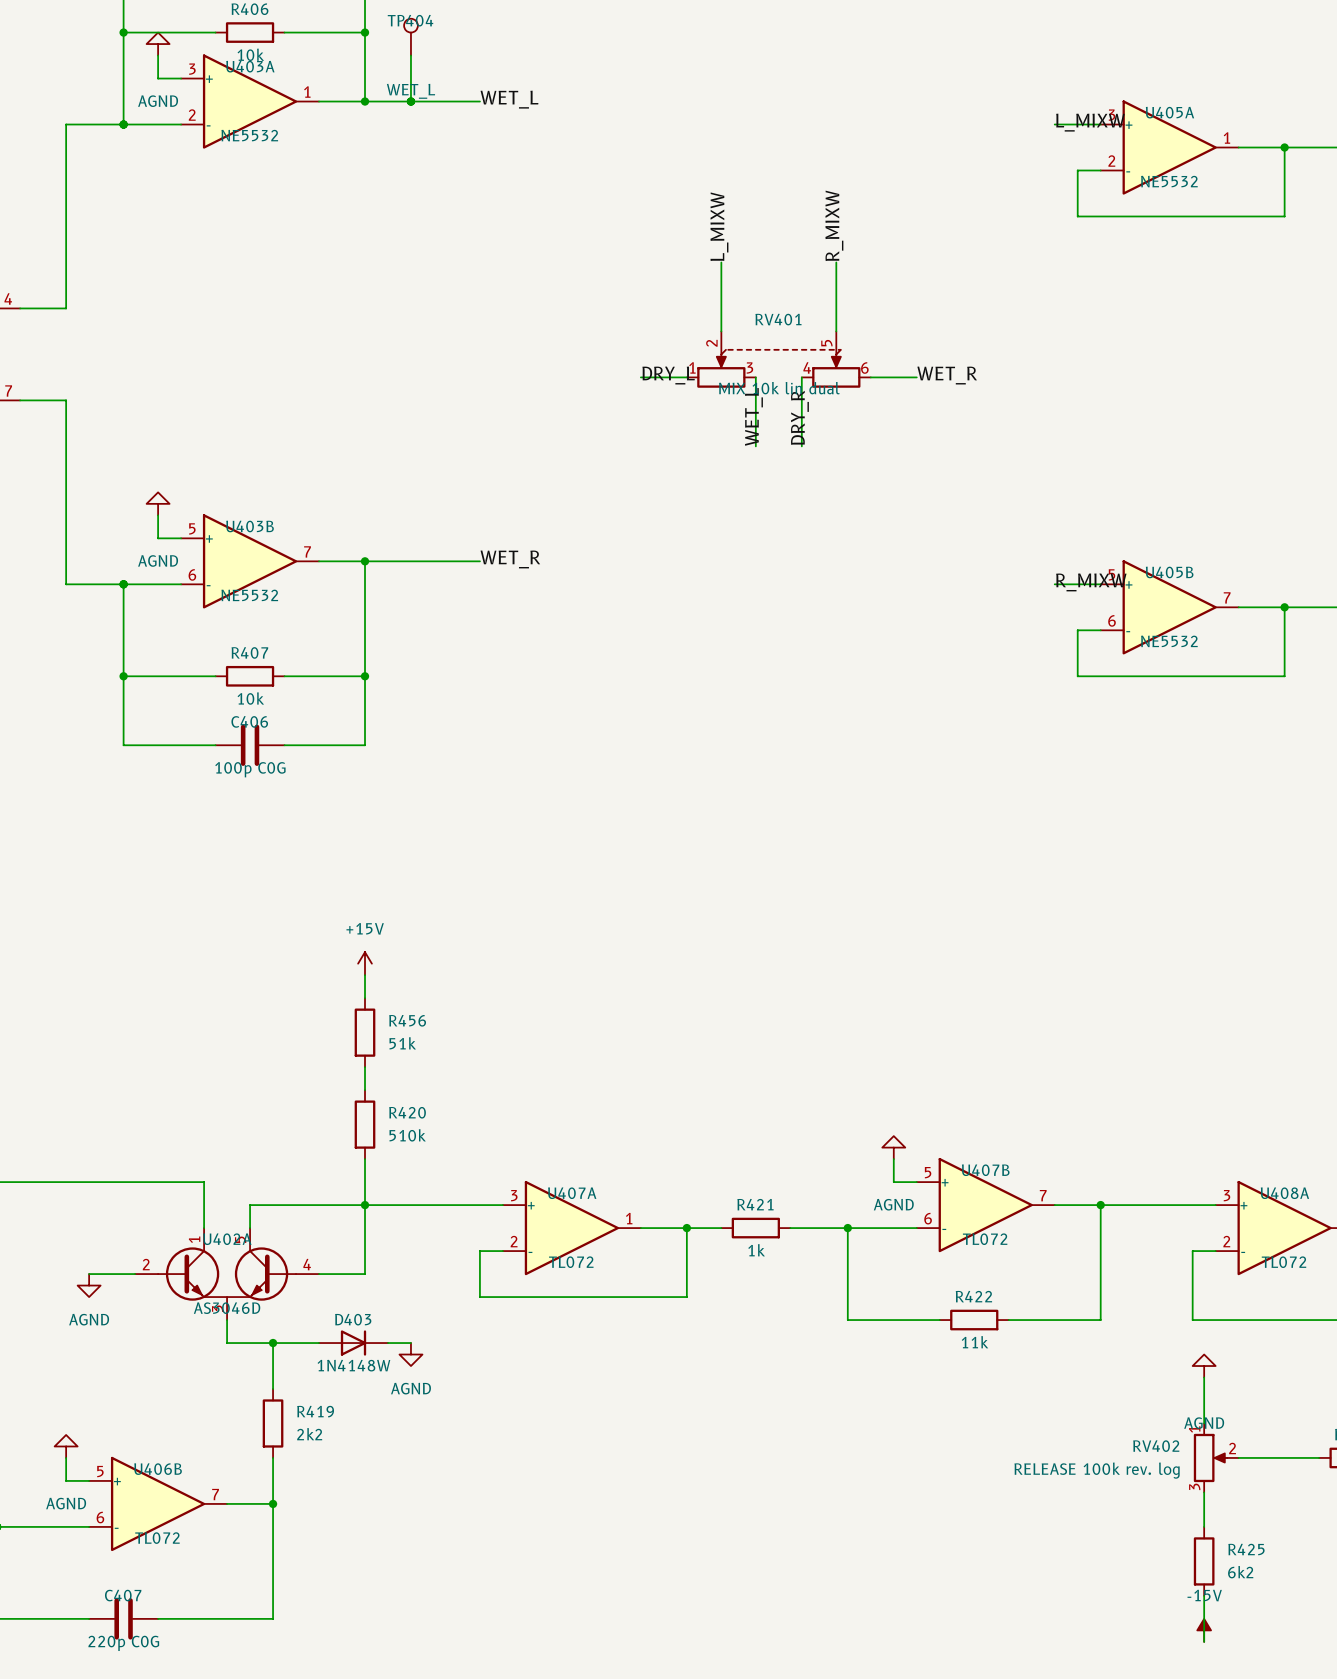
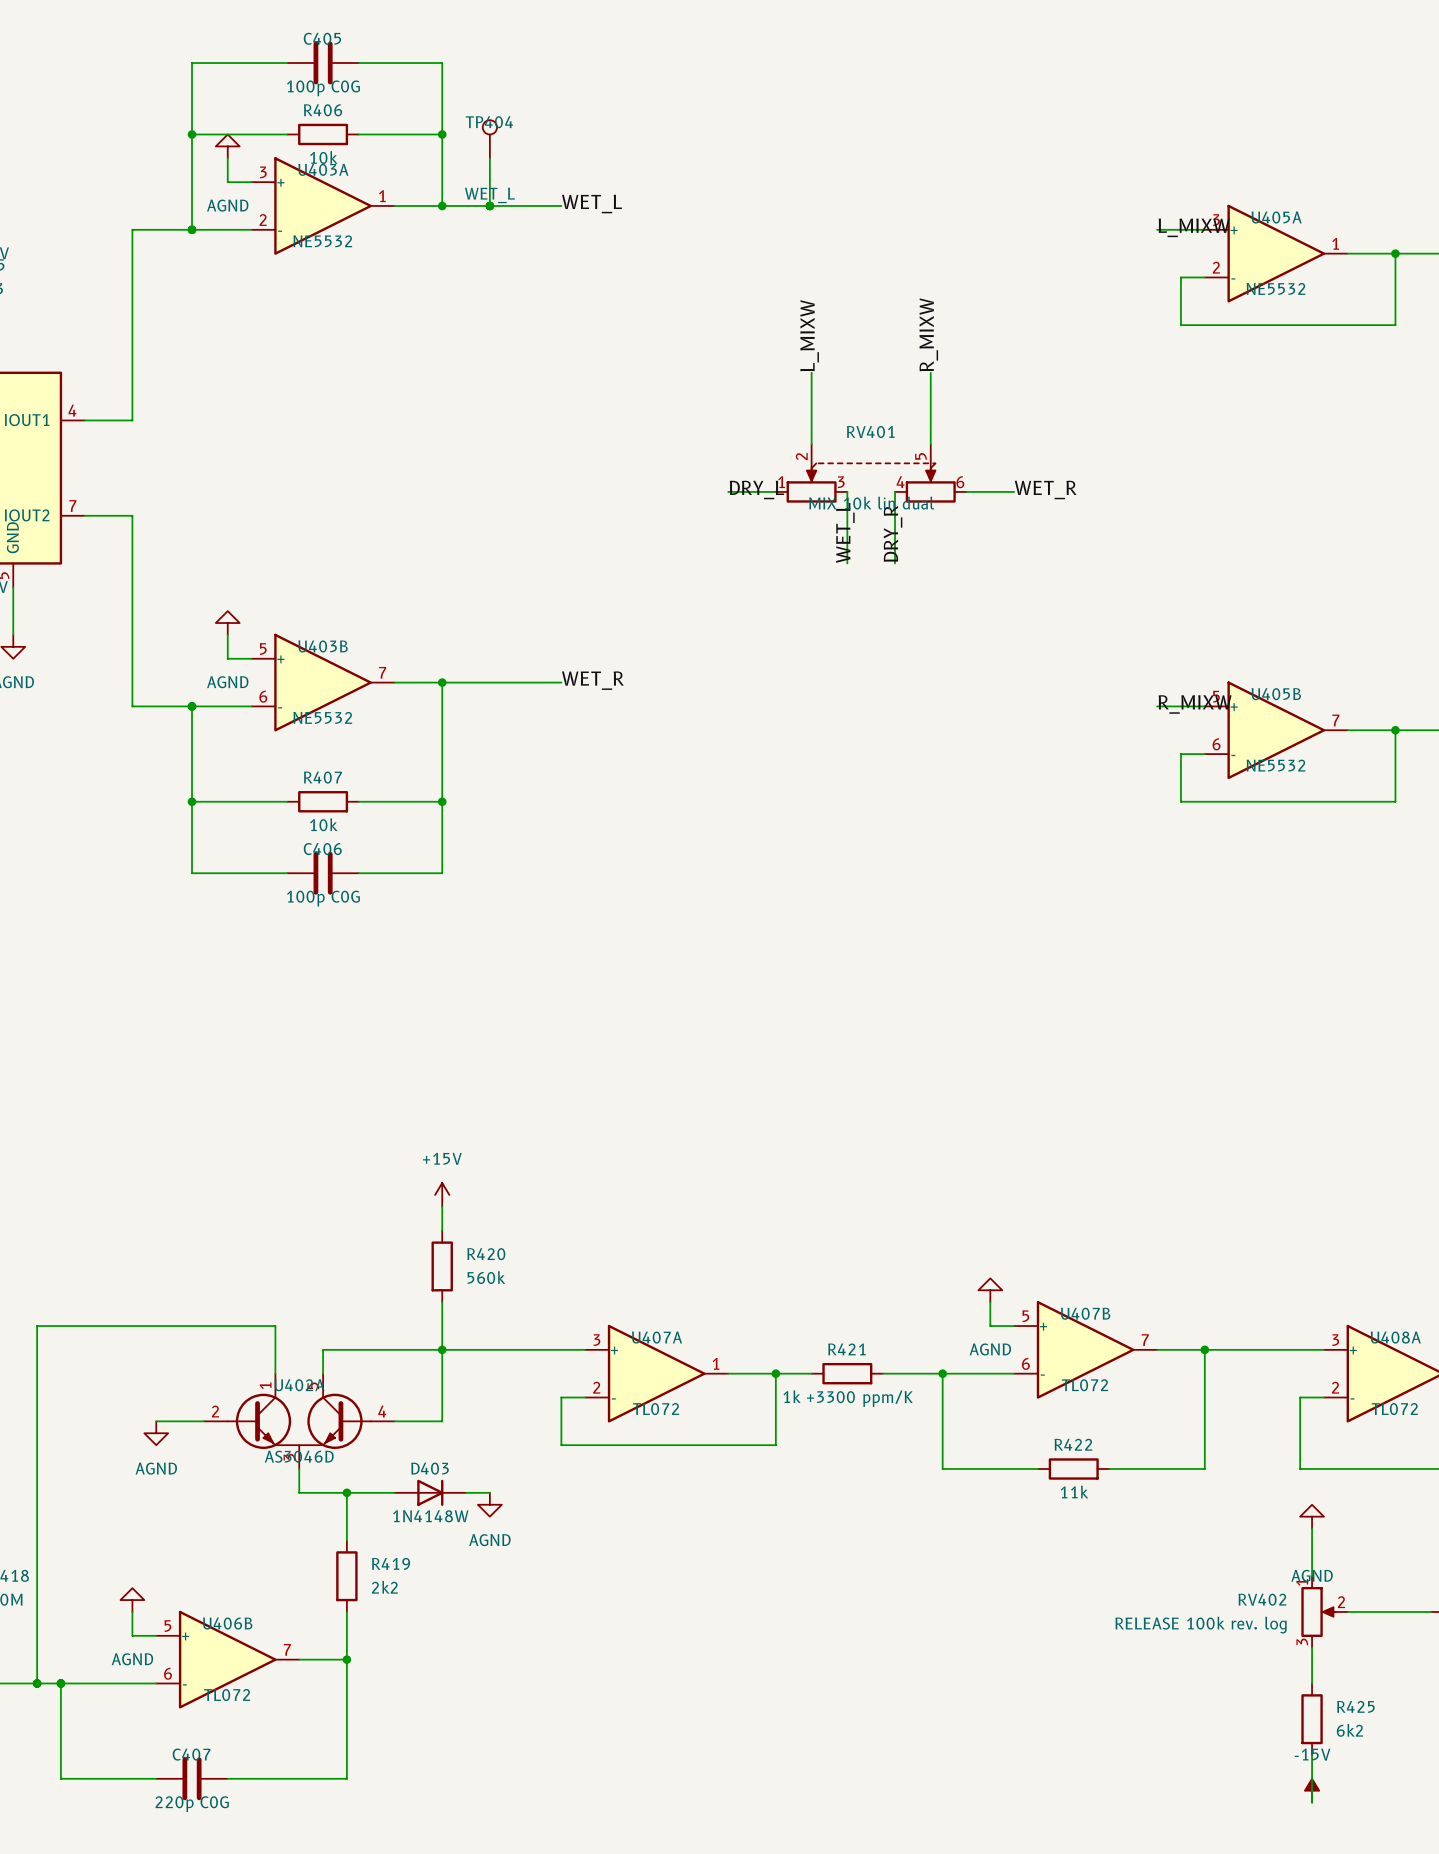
power symbol position: +15V (365, 963) -> +15V (442, 1194)
wire: (365, 975) (365, 998) -> none
R456: 51k (365, 1032) -> none
R420 value: 510k (407, 1135) -> 560k (486, 1277)
R421 value: 1k (756, 1250) -> 1k +3300 ppm/K (848, 1398)

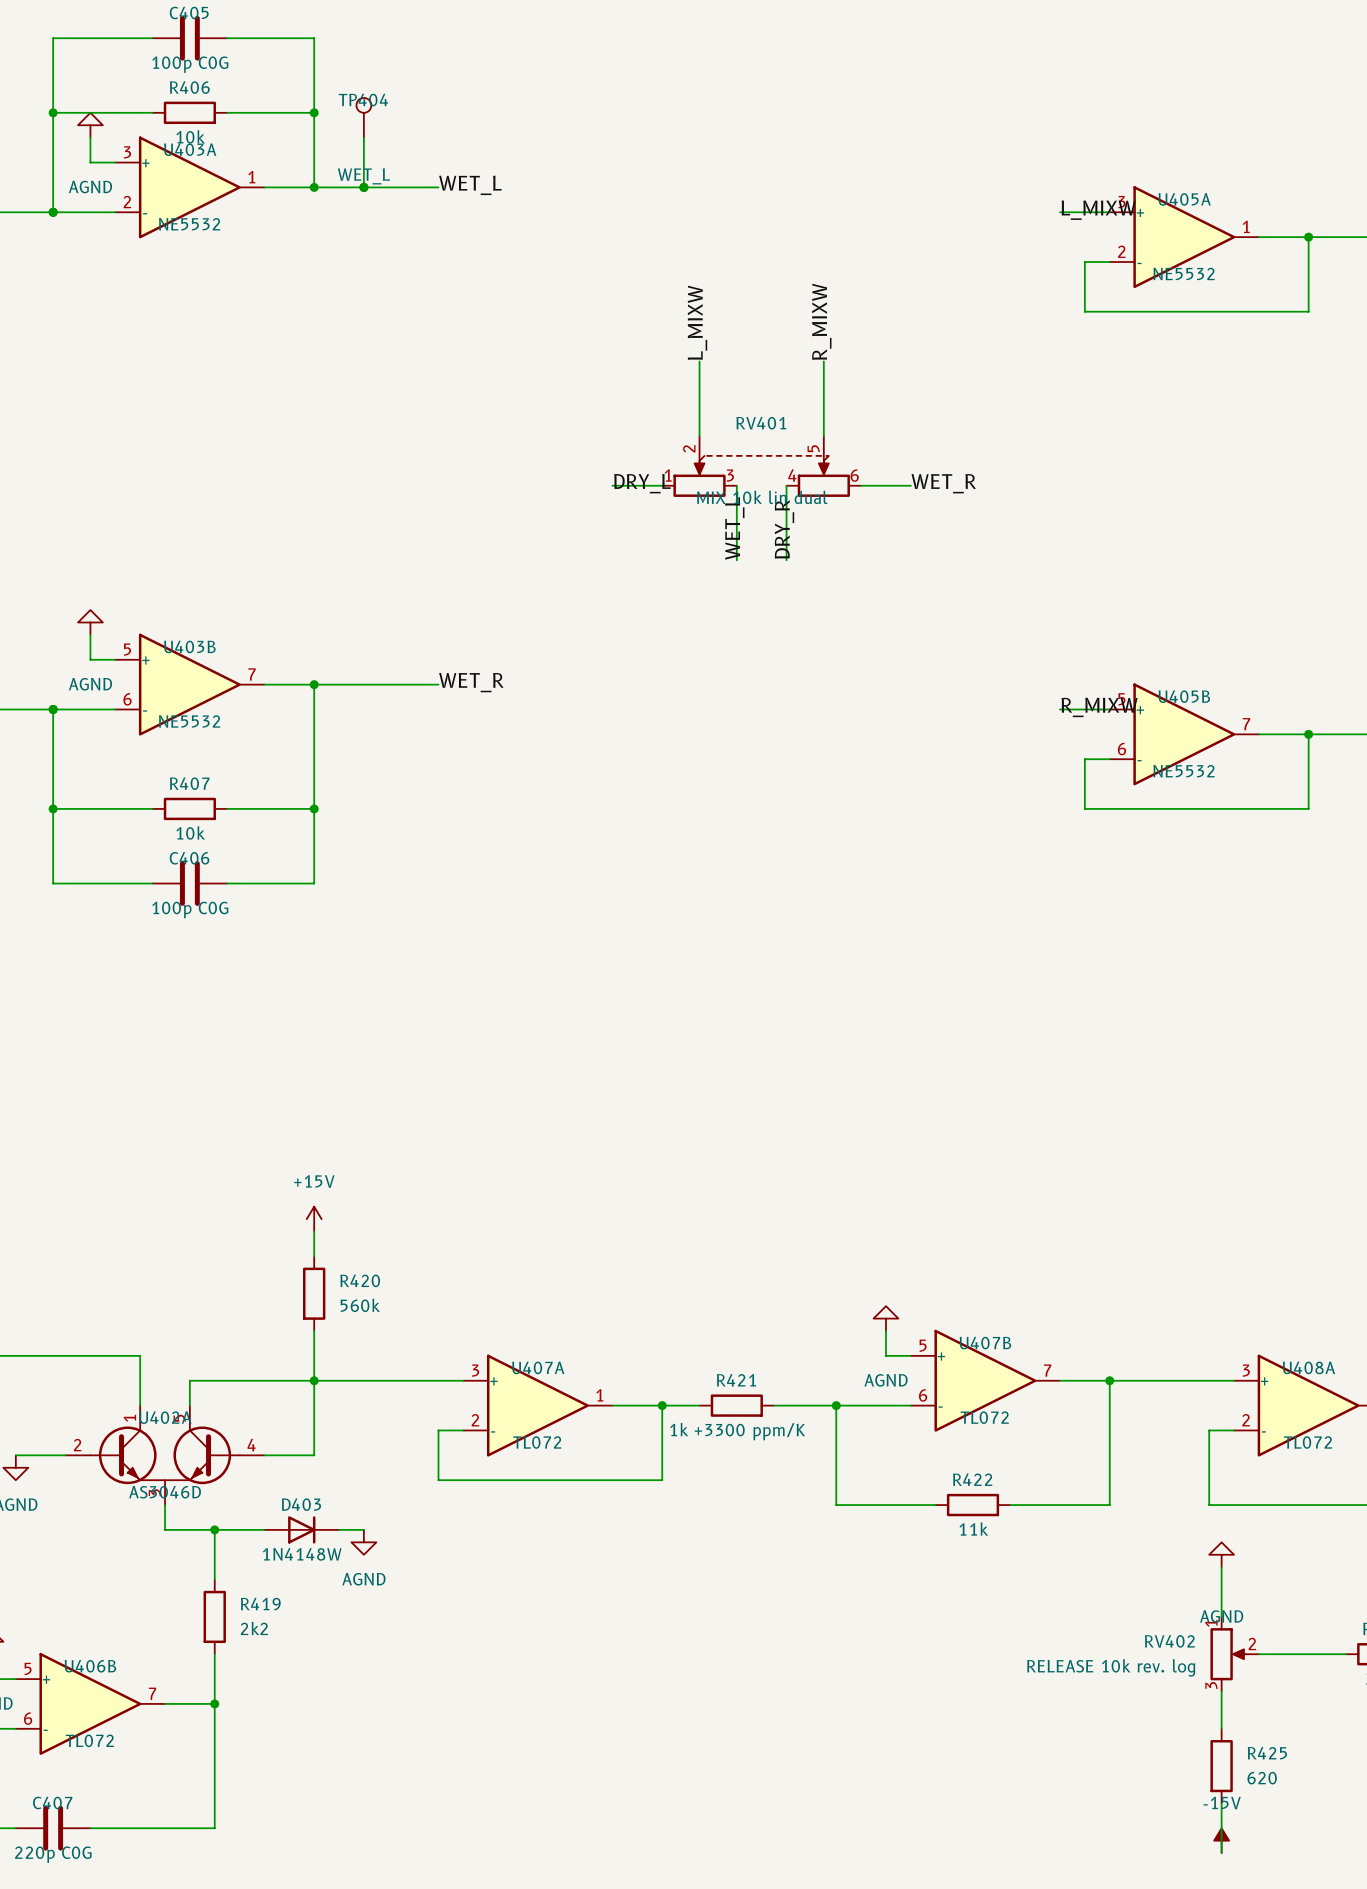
RV402 value: RELEASE 100k rev. log (1201, 1625) -> RELEASE 10k rev. log (1111, 1667)
R425 value: 6k2 (1349, 1730) -> 620 (1262, 1778)

